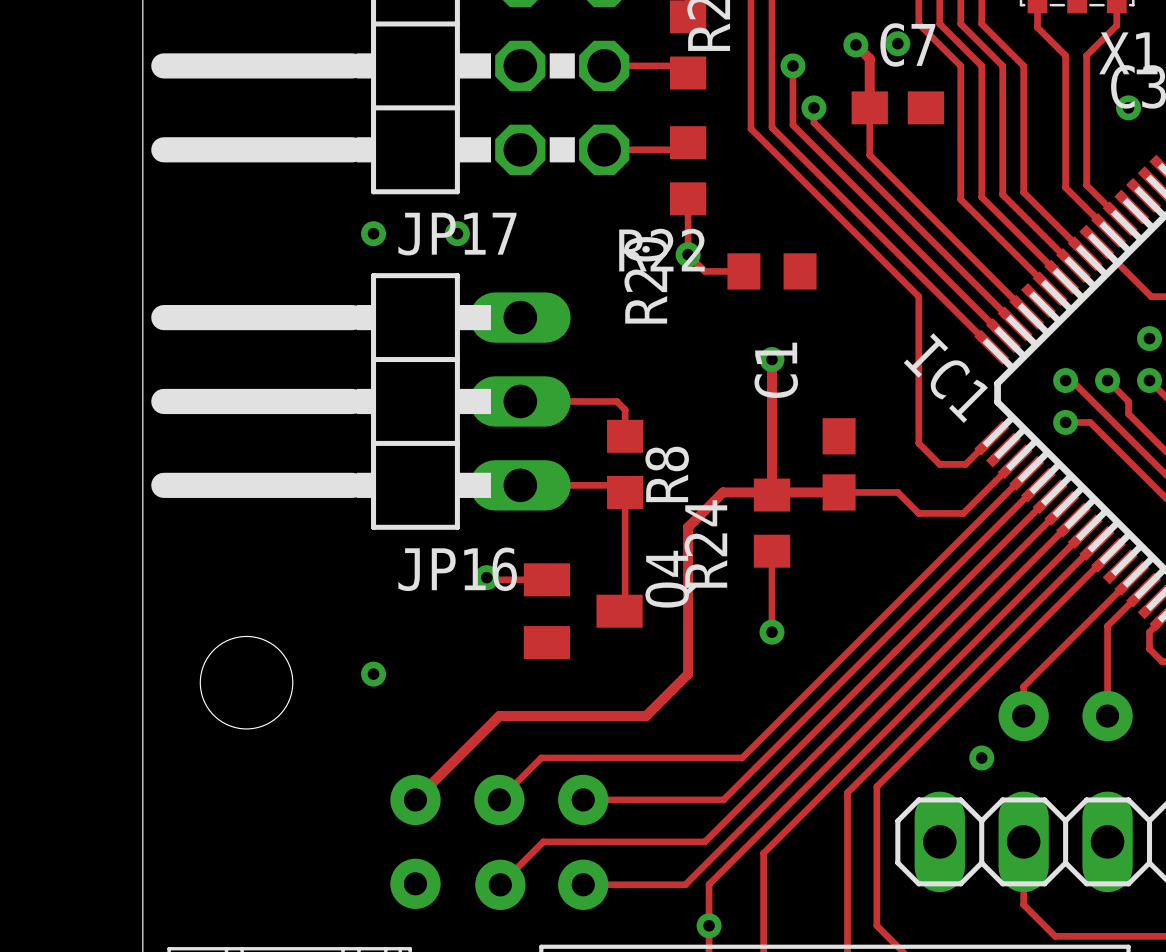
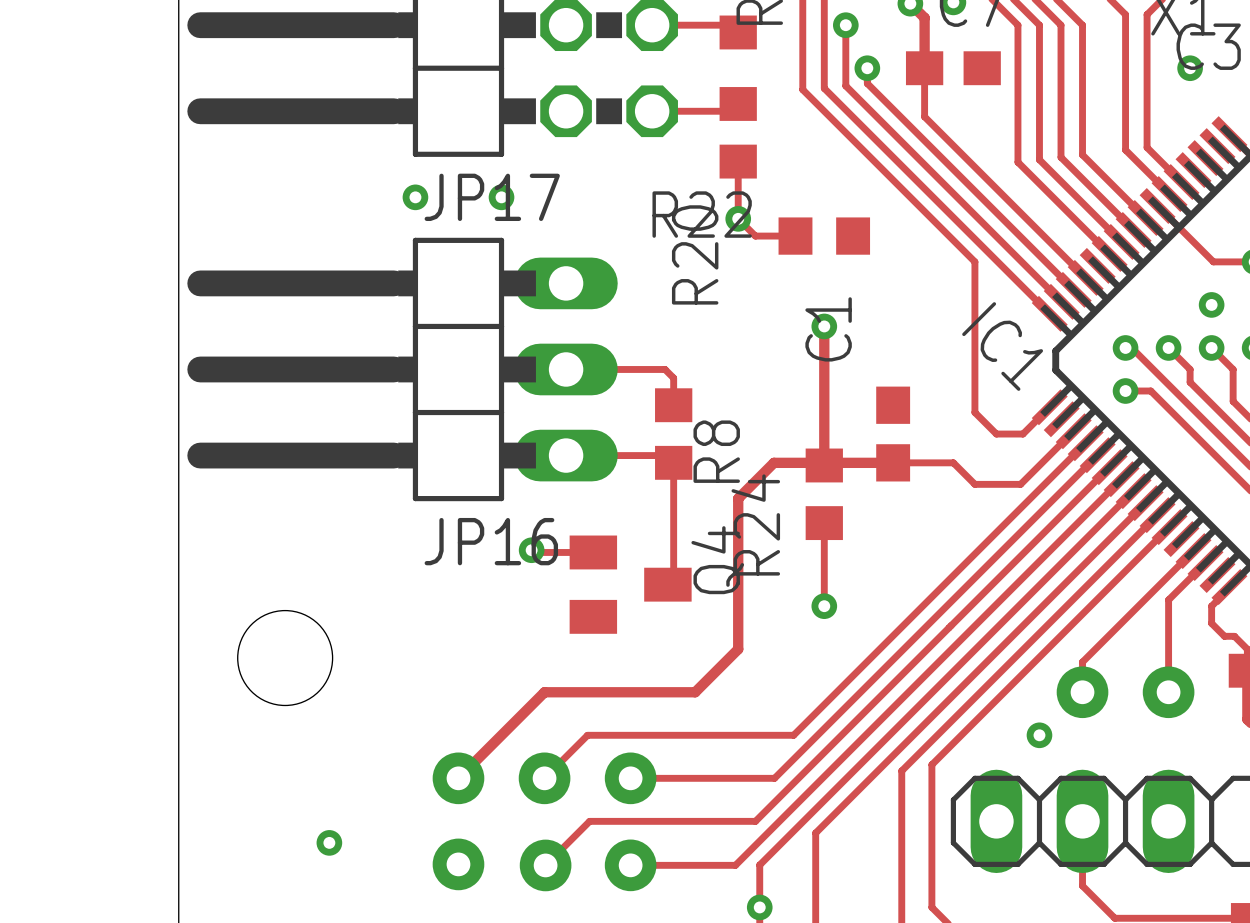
via: (373, 674) -> none
via: none -> (329, 842)

